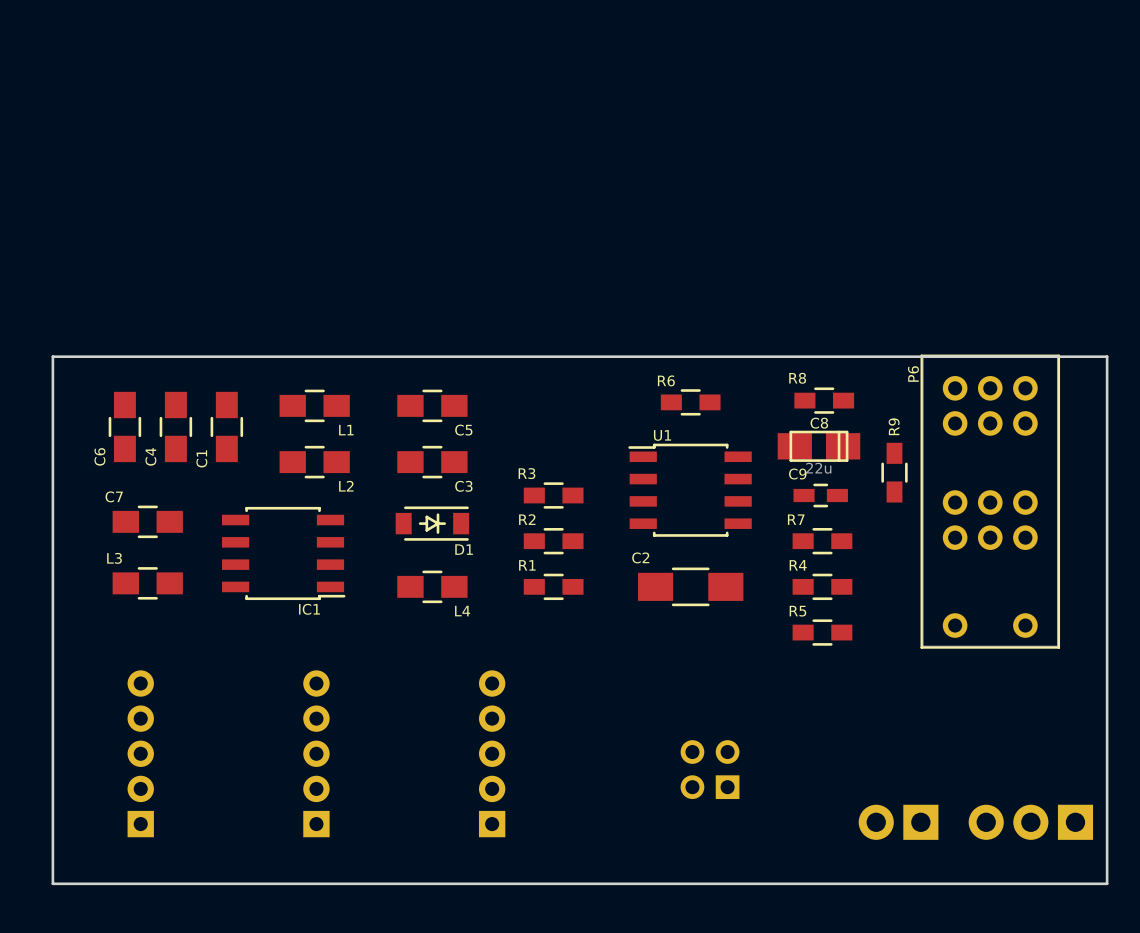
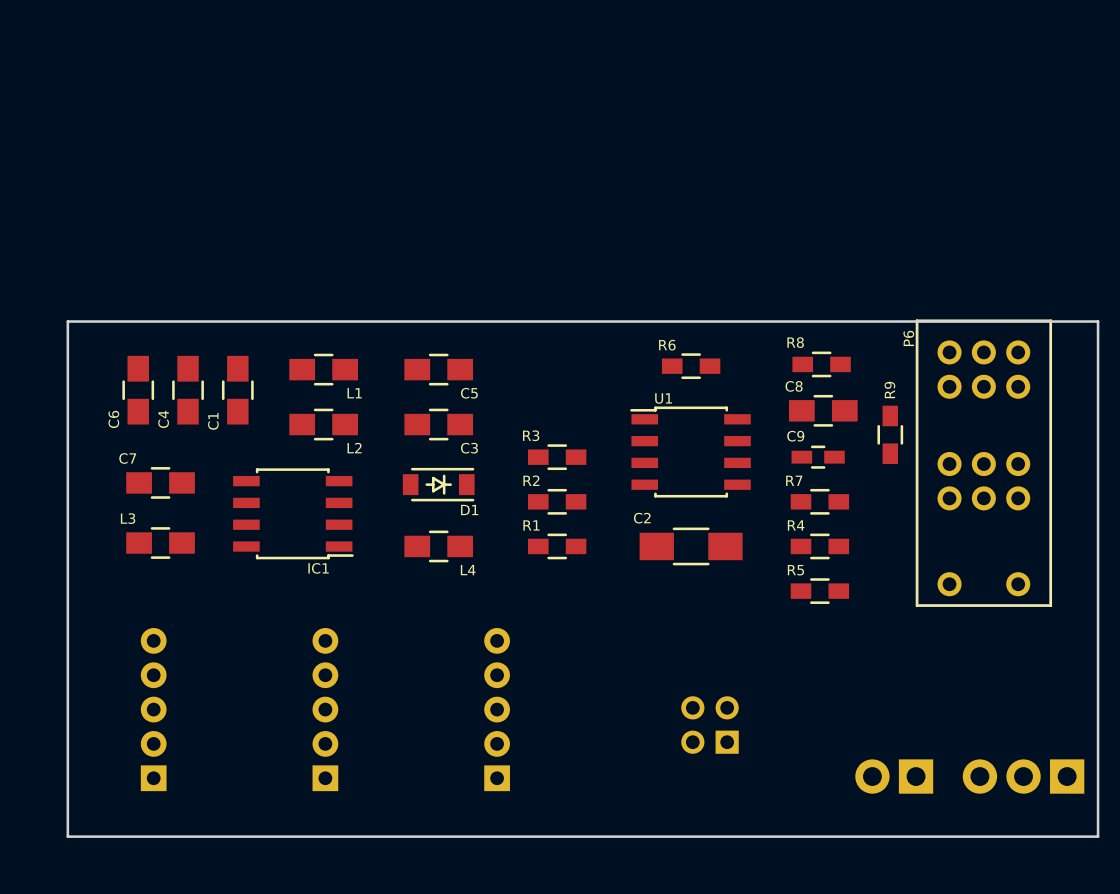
C8 footprint: [777, 430, 861, 462] -> [788, 394, 858, 427]
C8 value: 22u (818, 468) -> none

